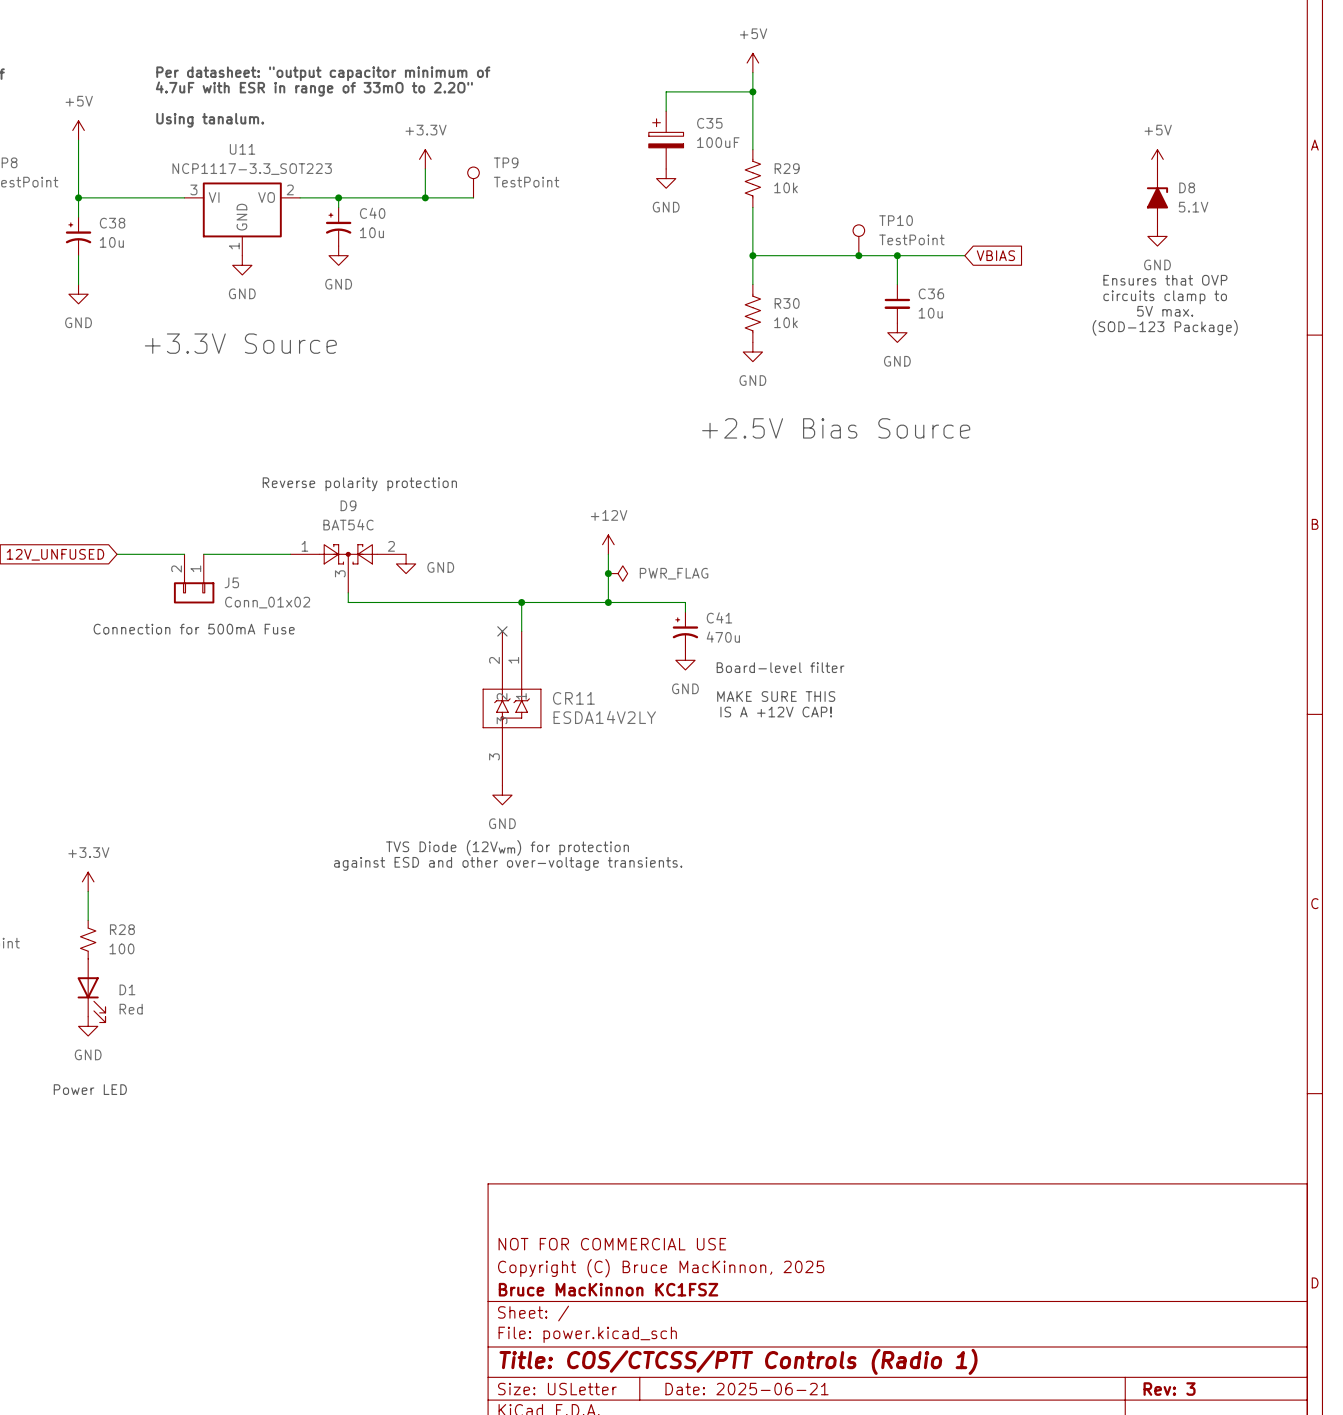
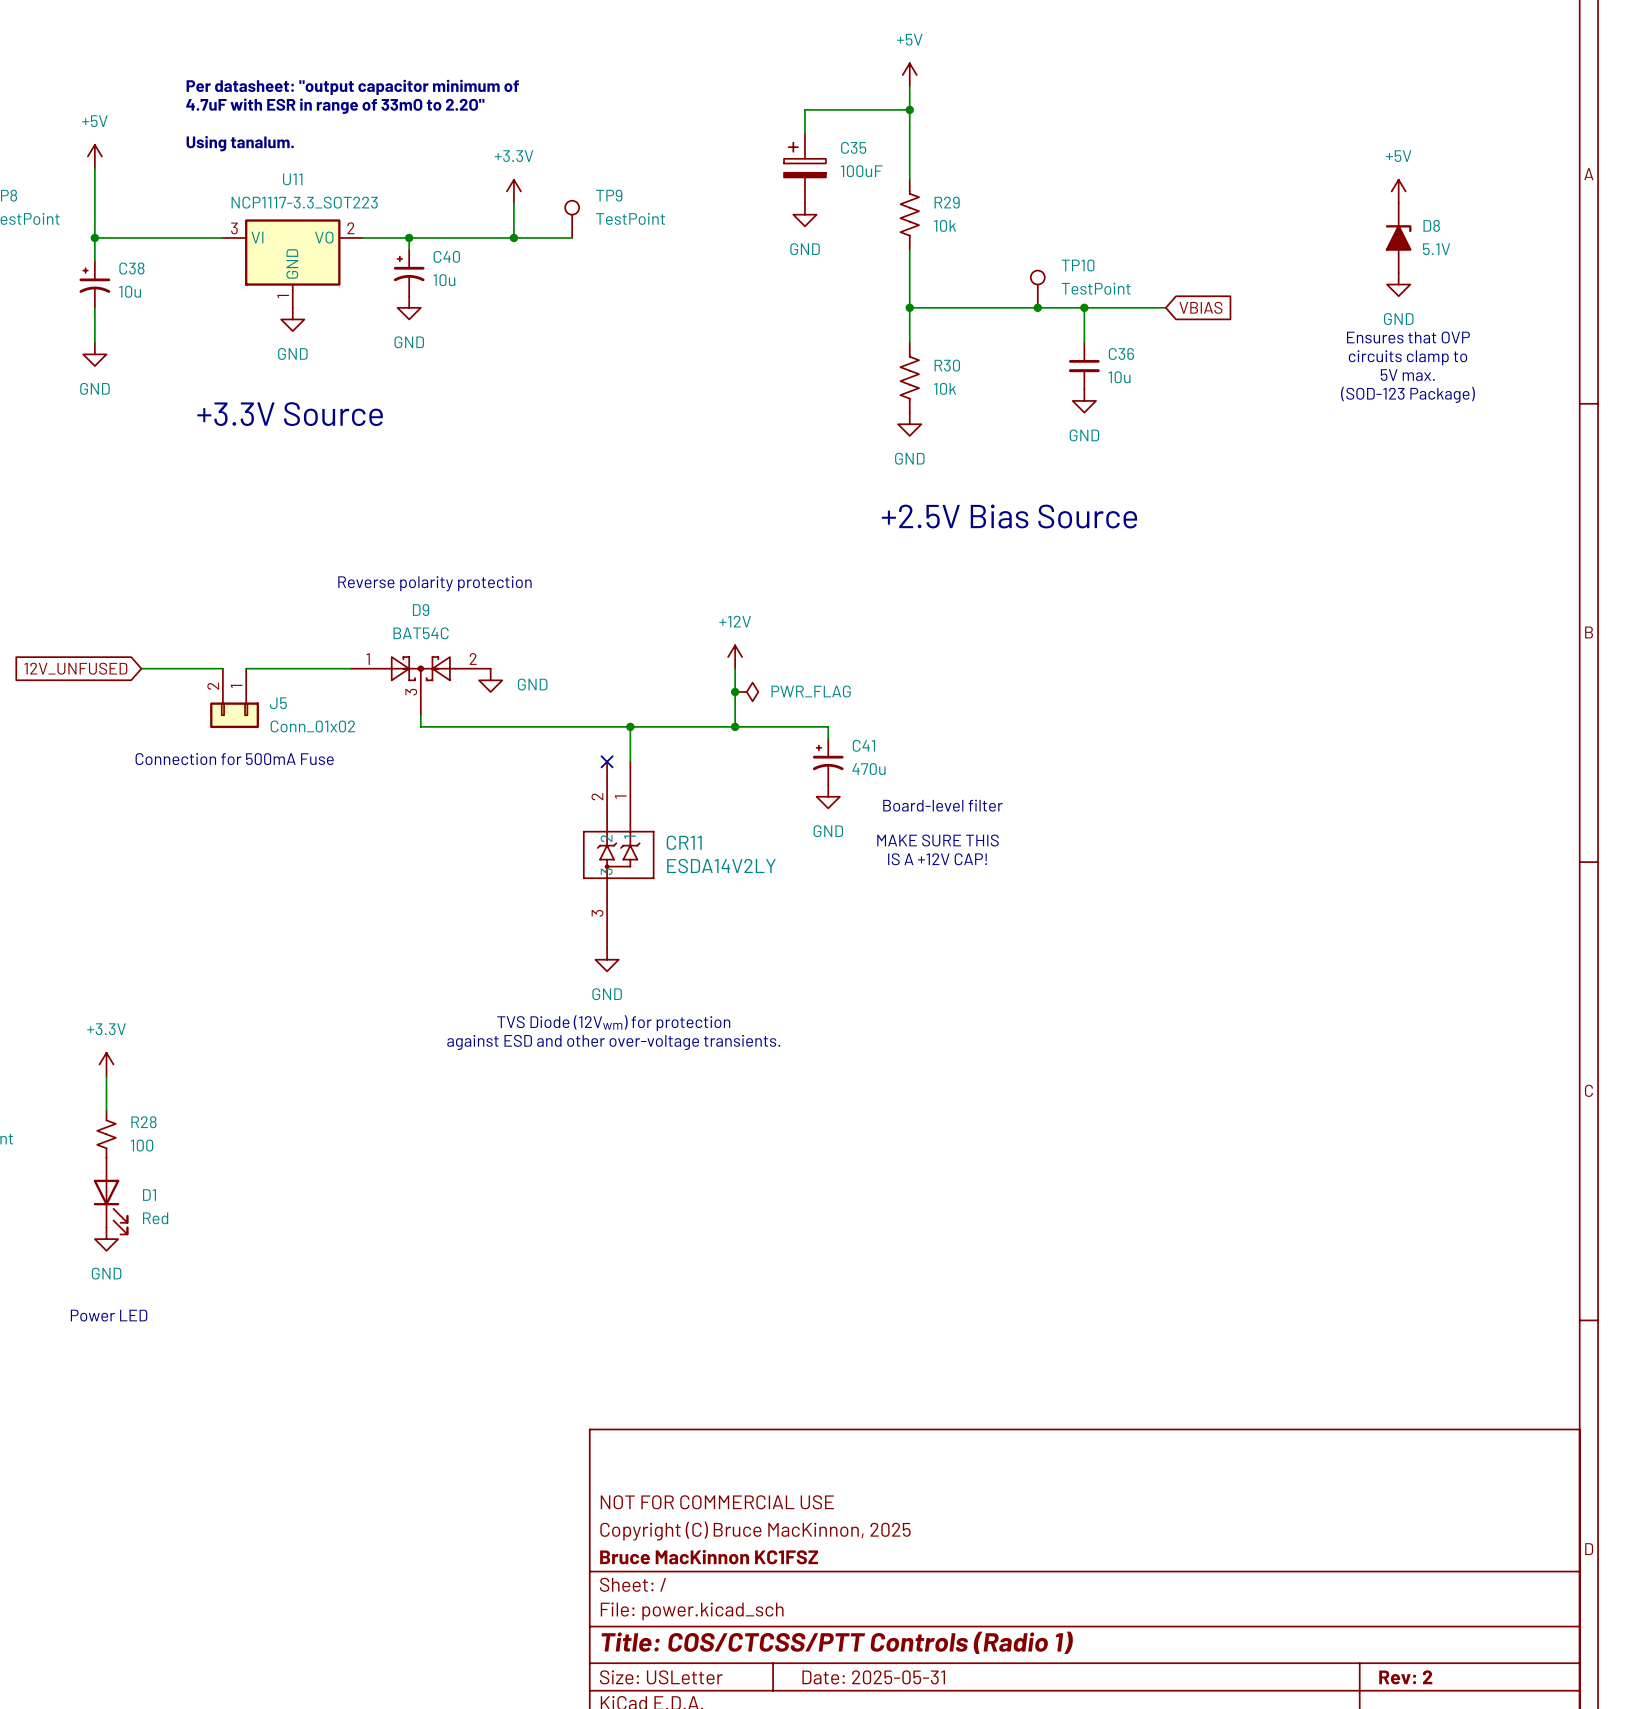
title block: Date: 2025-06-21 (747, 1389) -> Date: 2025-05-31 (873, 1677)
title block: Rev: 3 (1169, 1389) -> Rev: 2 (1405, 1677)

